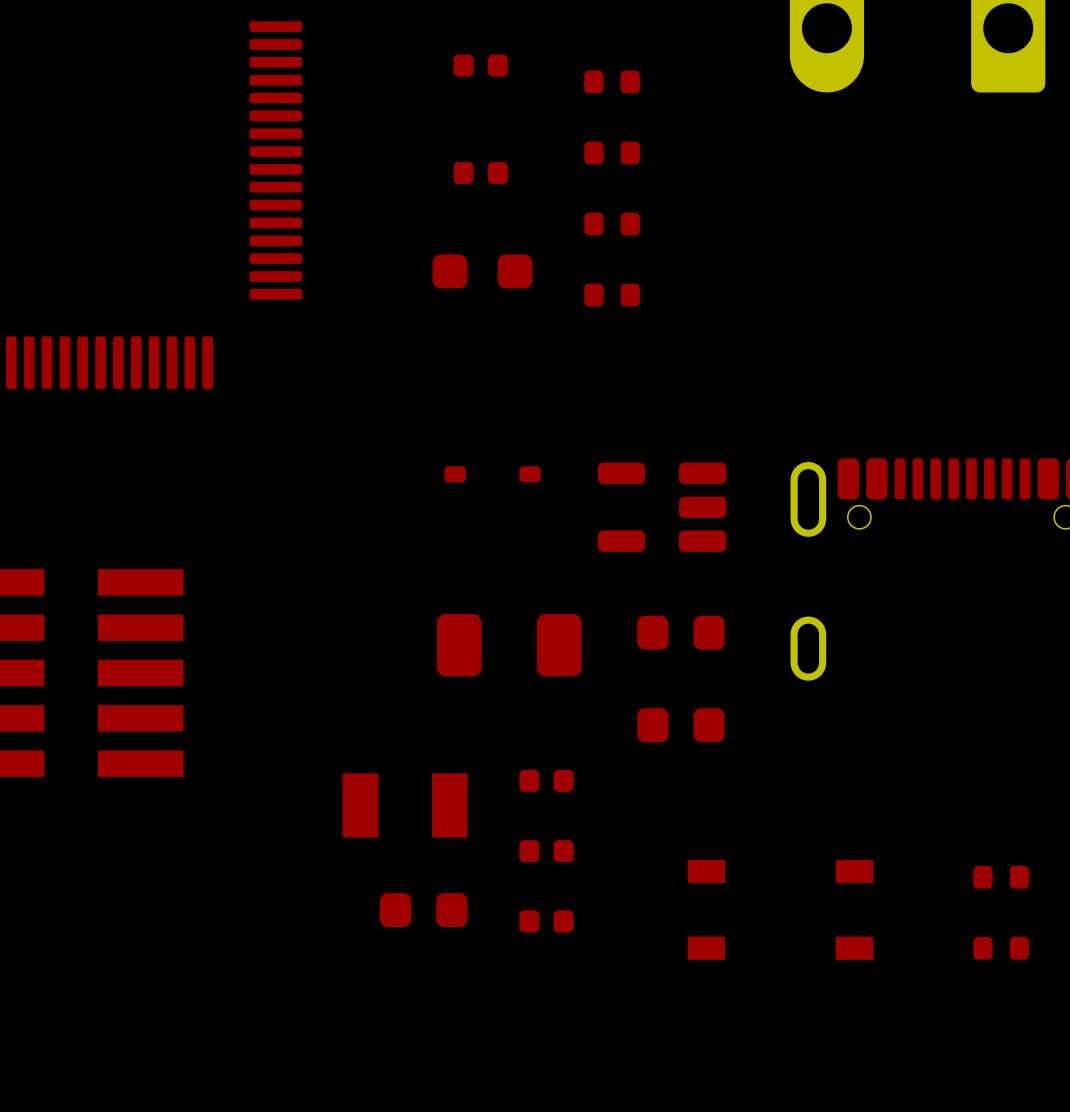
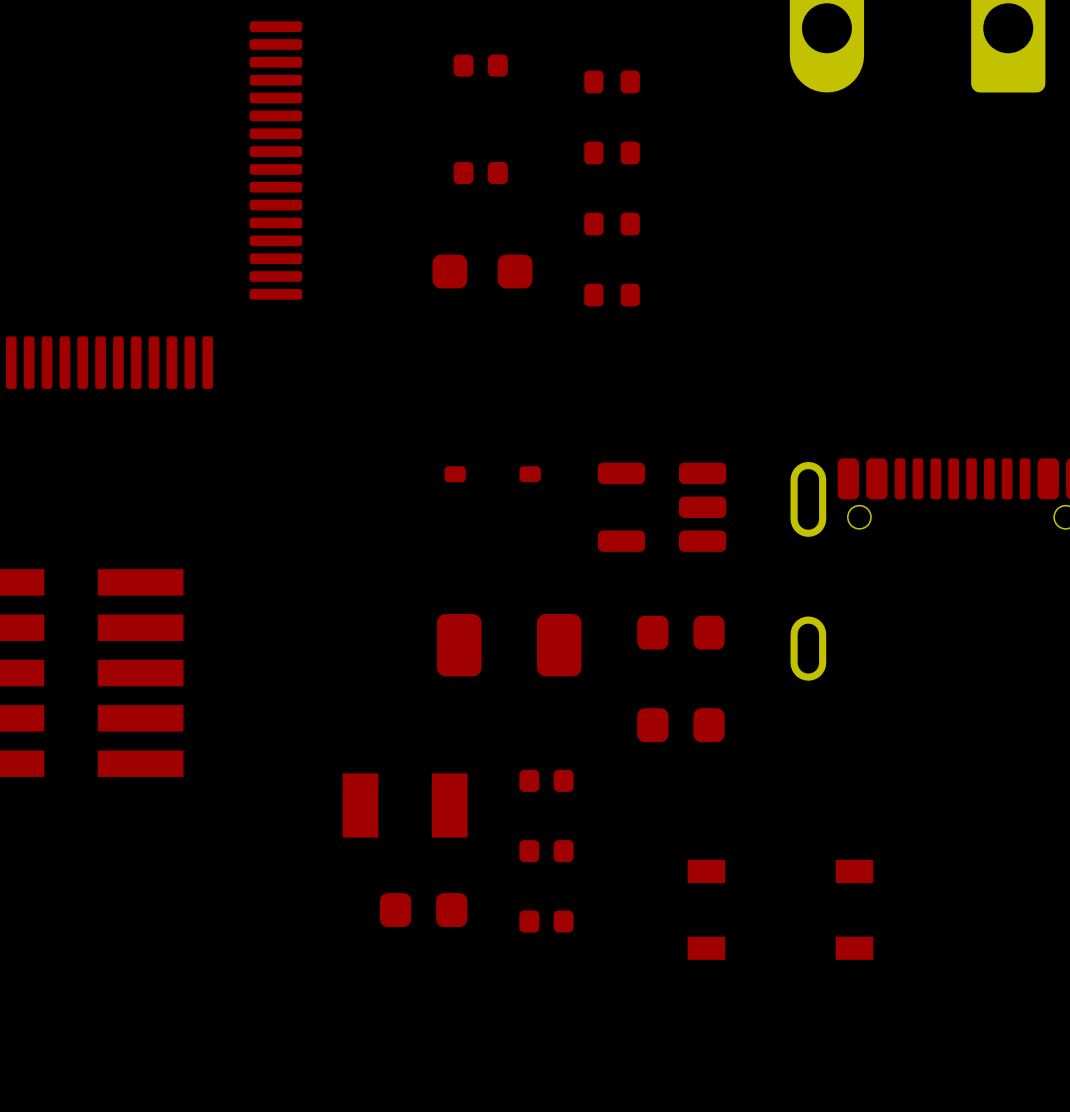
part: (1001, 877) -> none
part: (1001, 948) -> none

